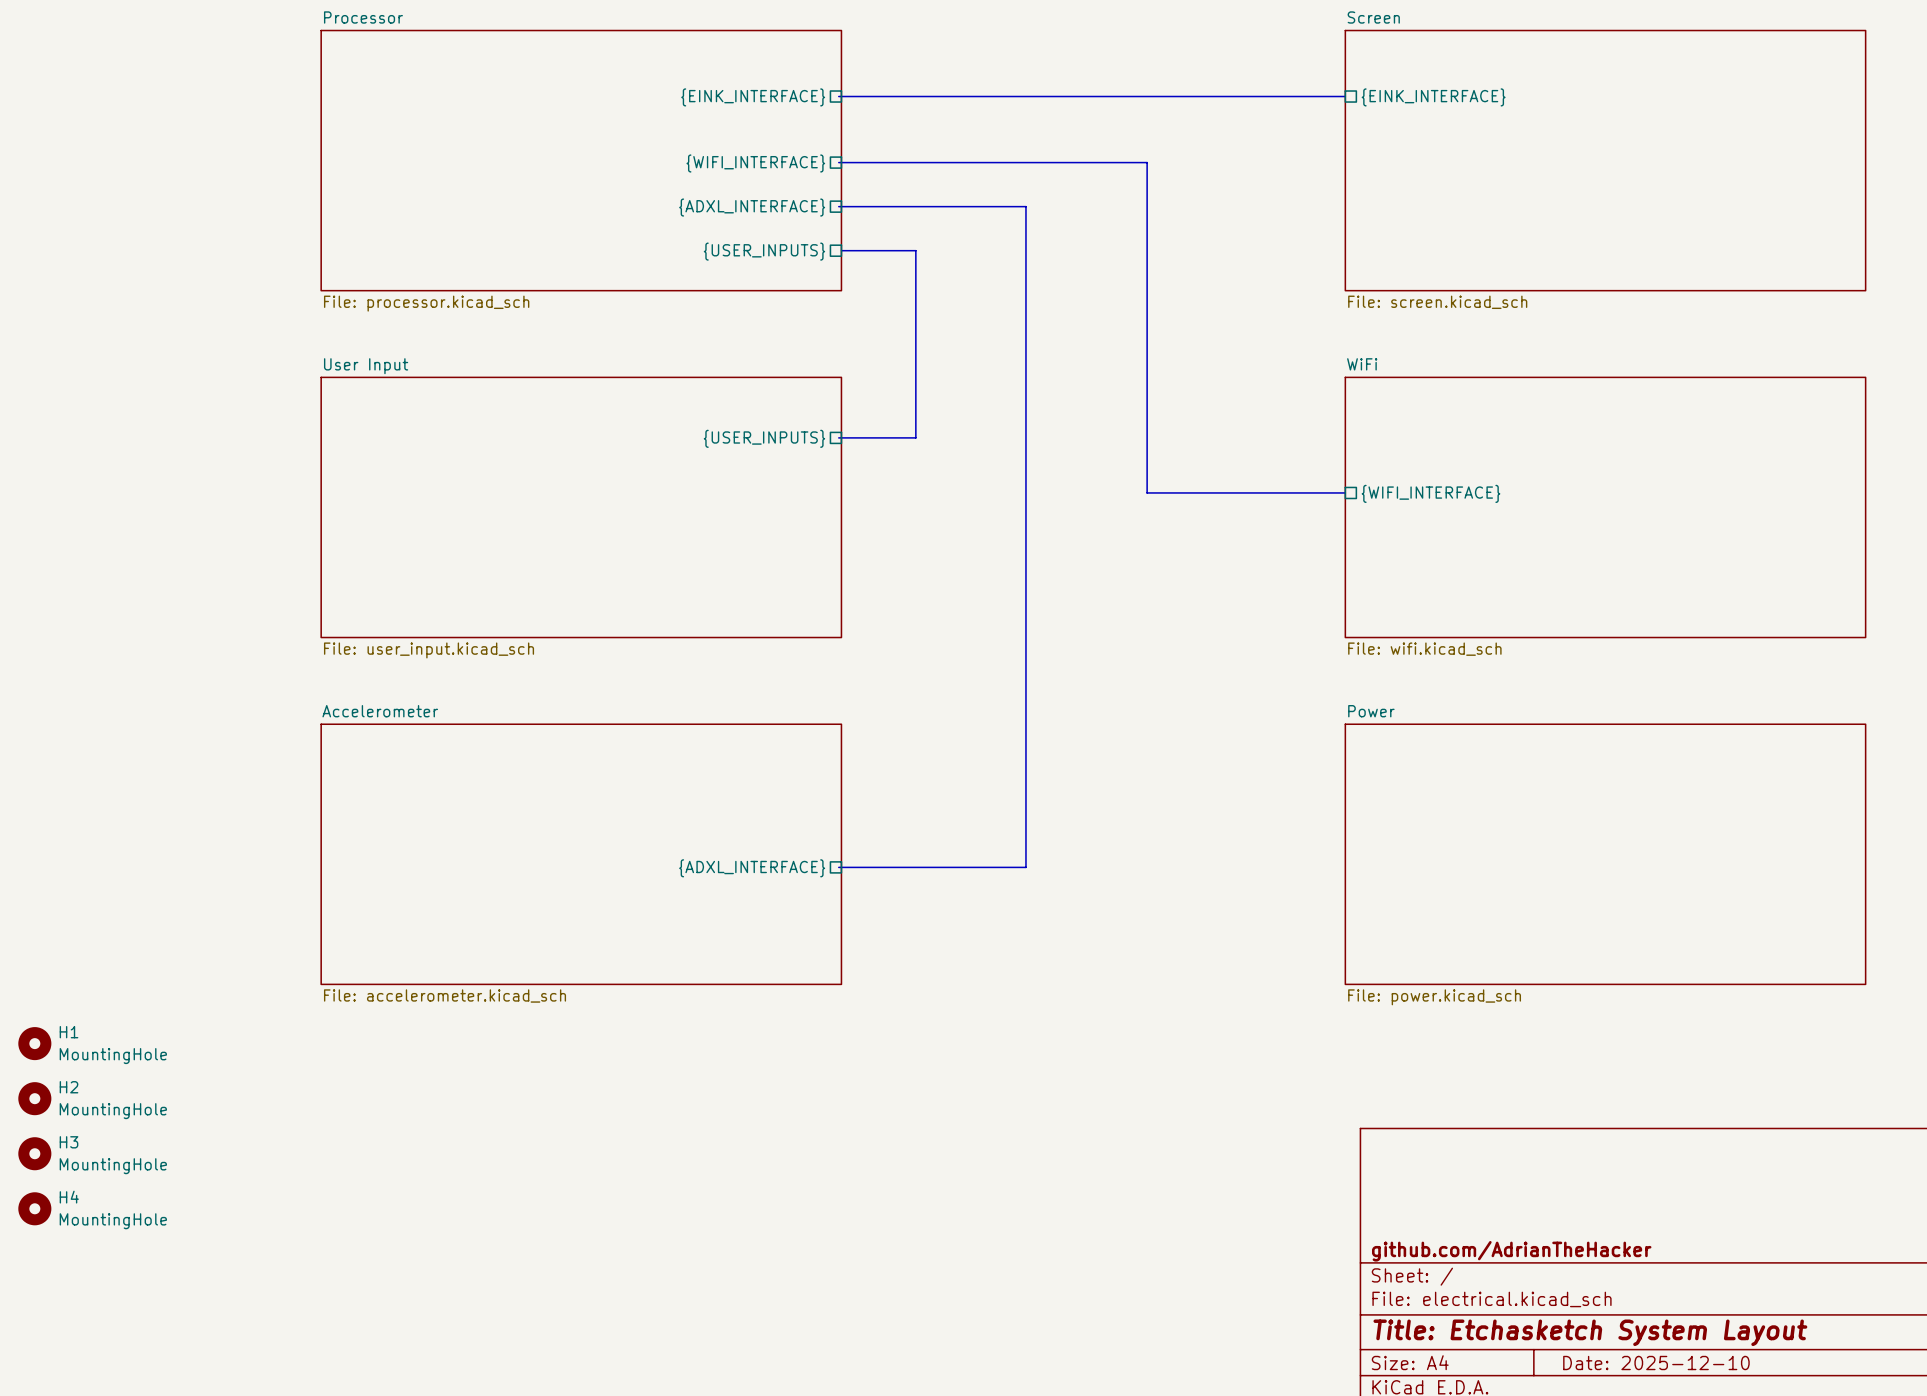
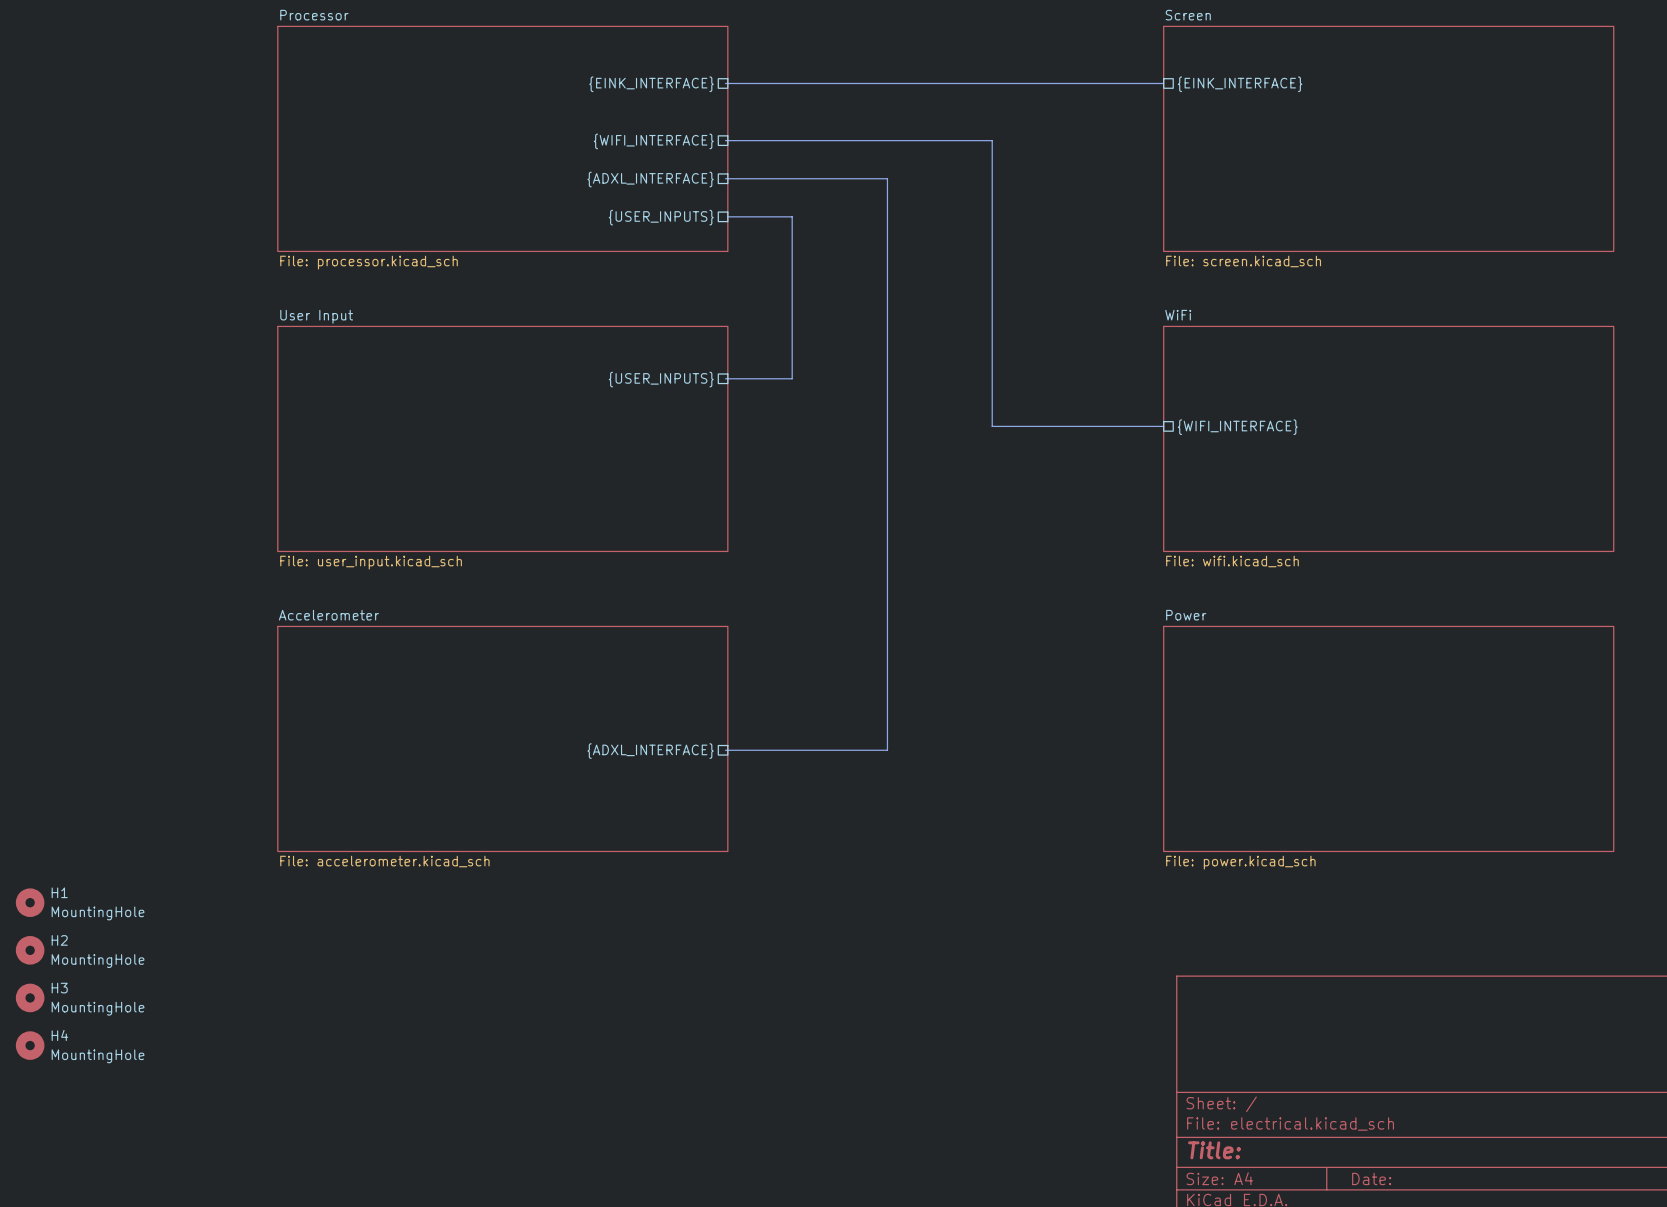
title block: github.com/AdrianTheHacker (1511, 1251) -> none
title block: Title: Etchasketch System Layout (1590, 1332) -> Title: (1214, 1150)
title block: Date: 2025-12-10 (1656, 1363) -> Date: (1371, 1178)

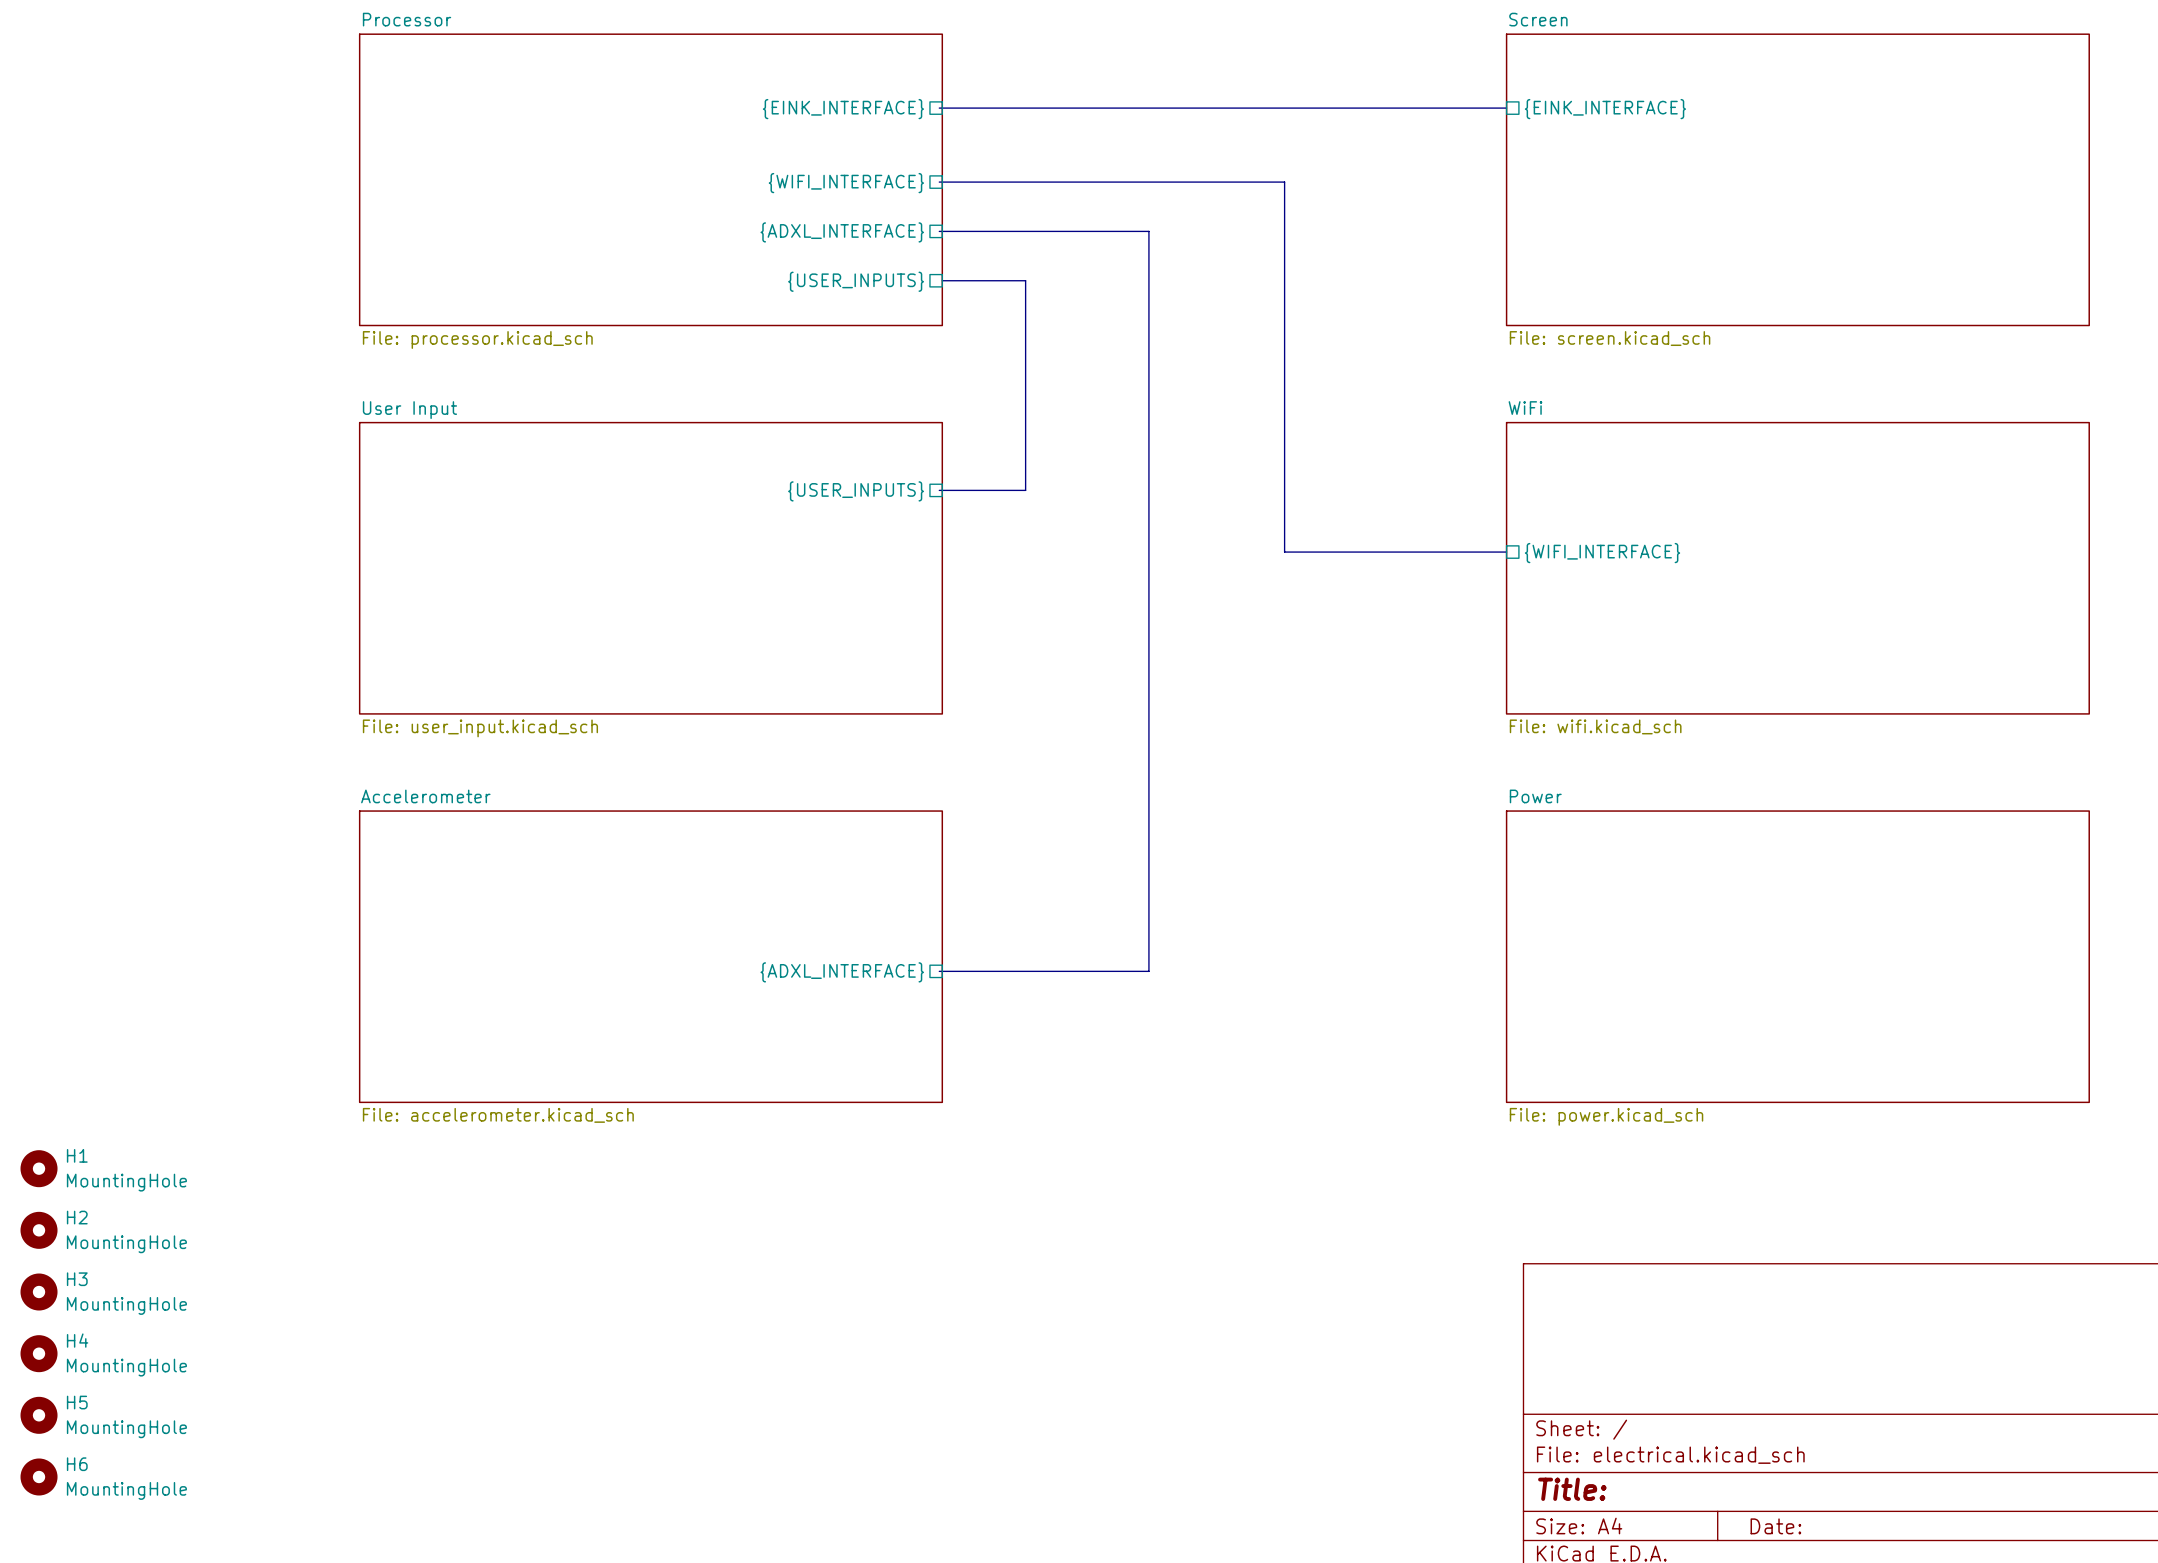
H5: none -> MountingHole (39, 1415)
H6: none -> MountingHole (39, 1476)

